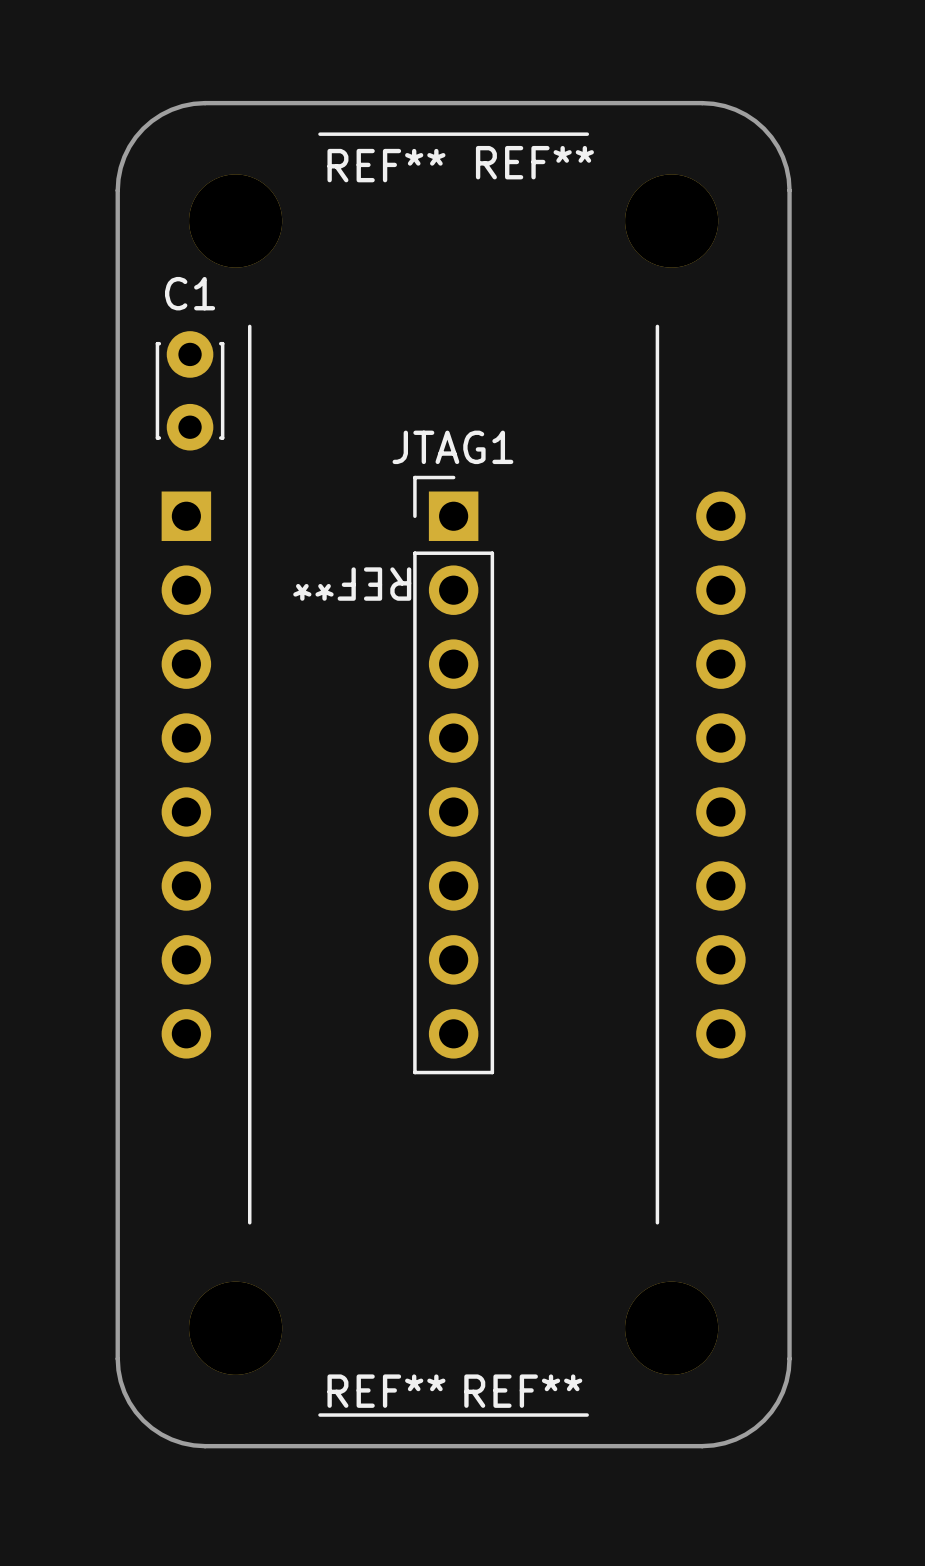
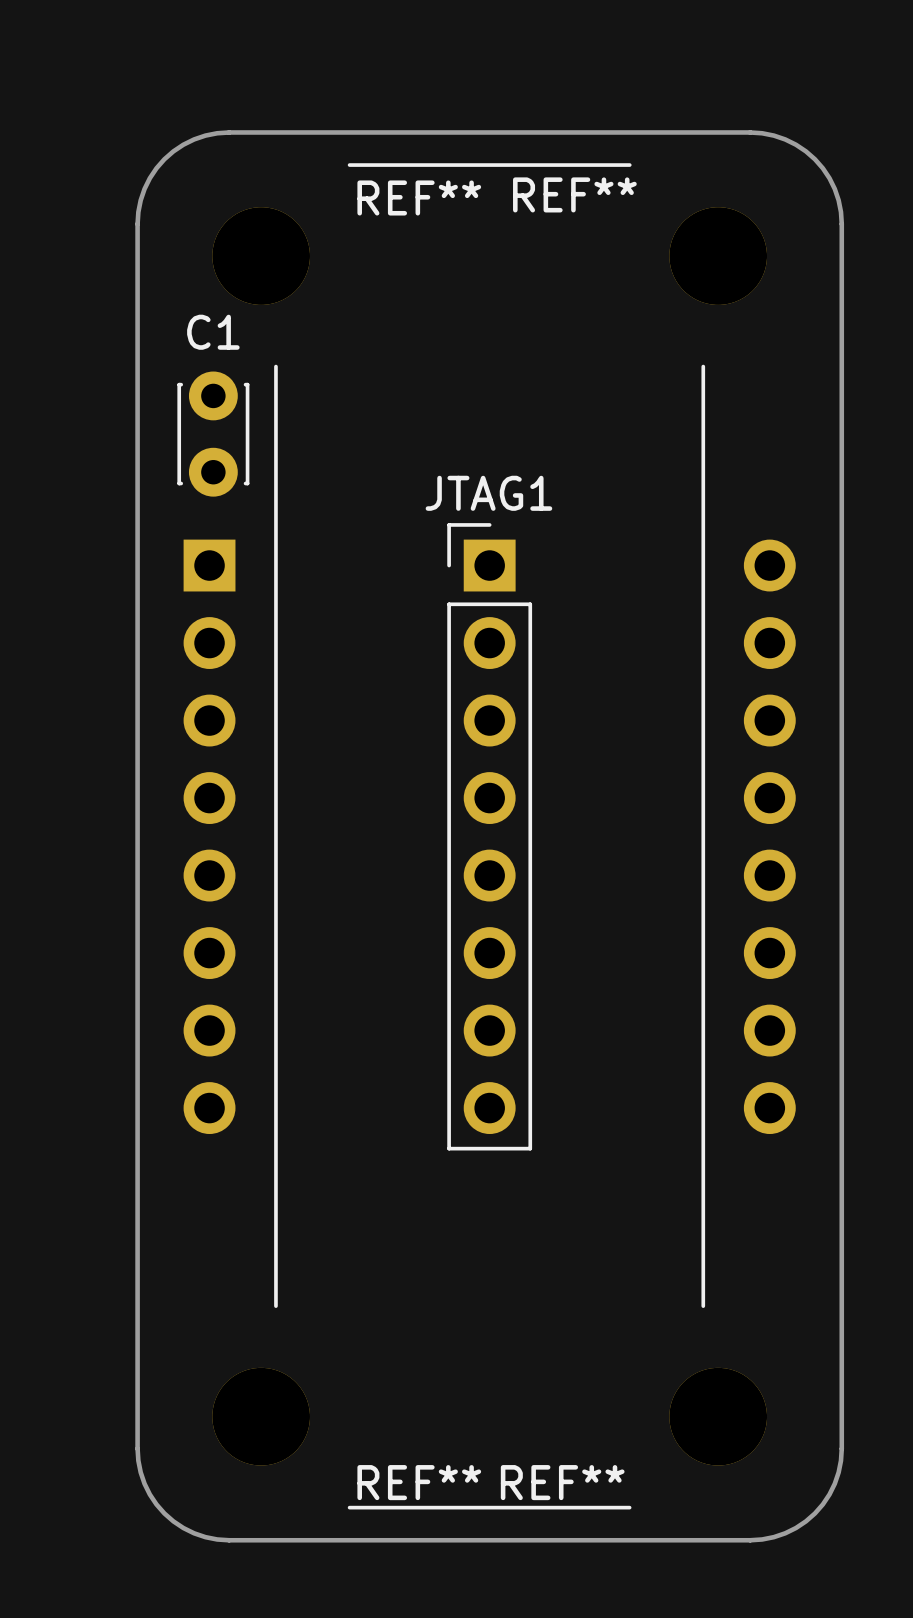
REF**: (352, 584) -> none

